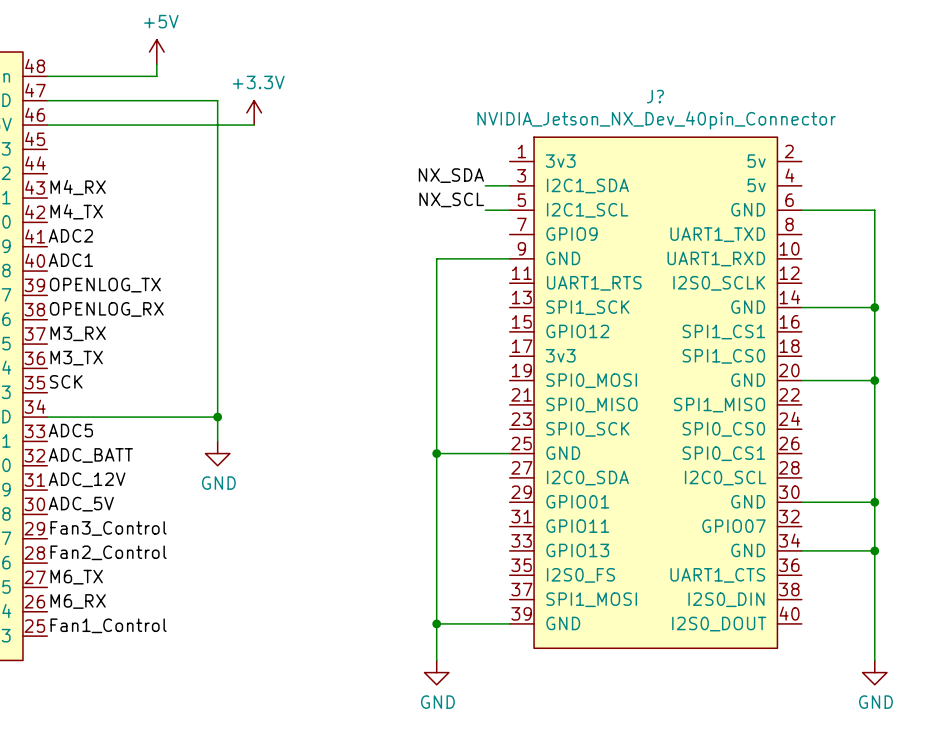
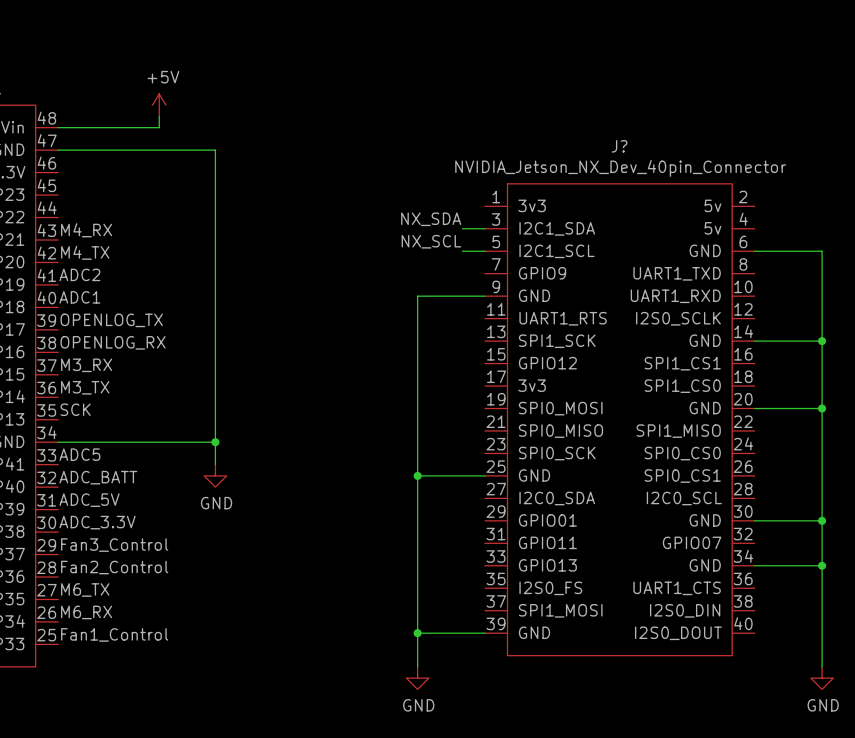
power symbol: +3.3V (254, 112) -> none
wire: (47, 125) (254, 125) -> none
label: ADC_12V (87, 479) -> ADC_5V (89, 500)
label: ADC_5V (81, 504) -> ADC_3.3V (97, 522)

